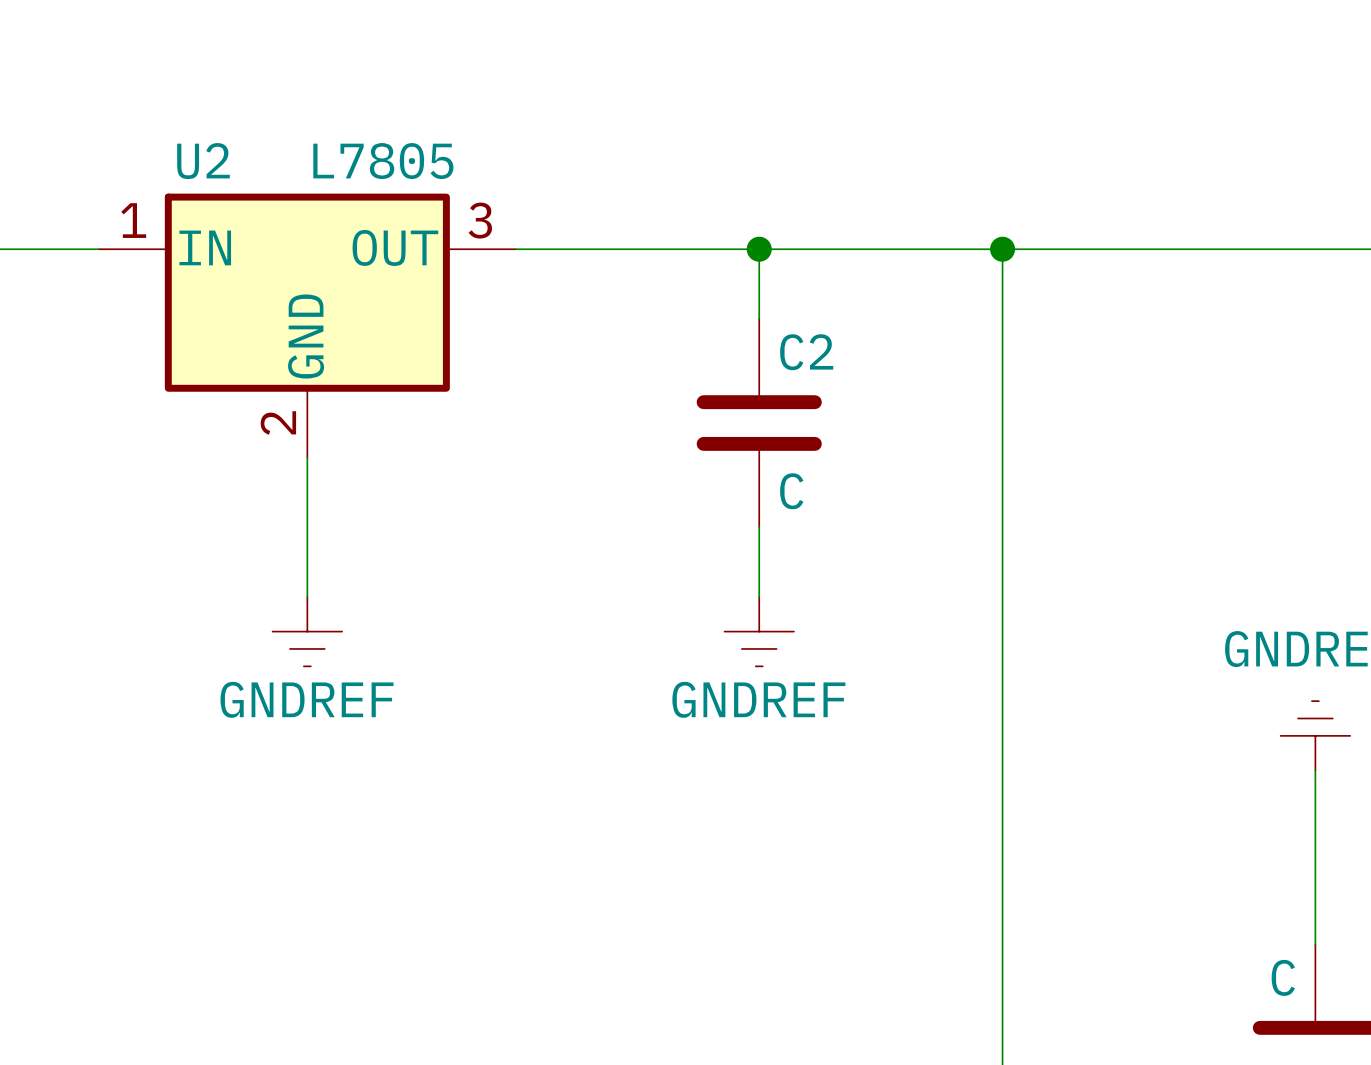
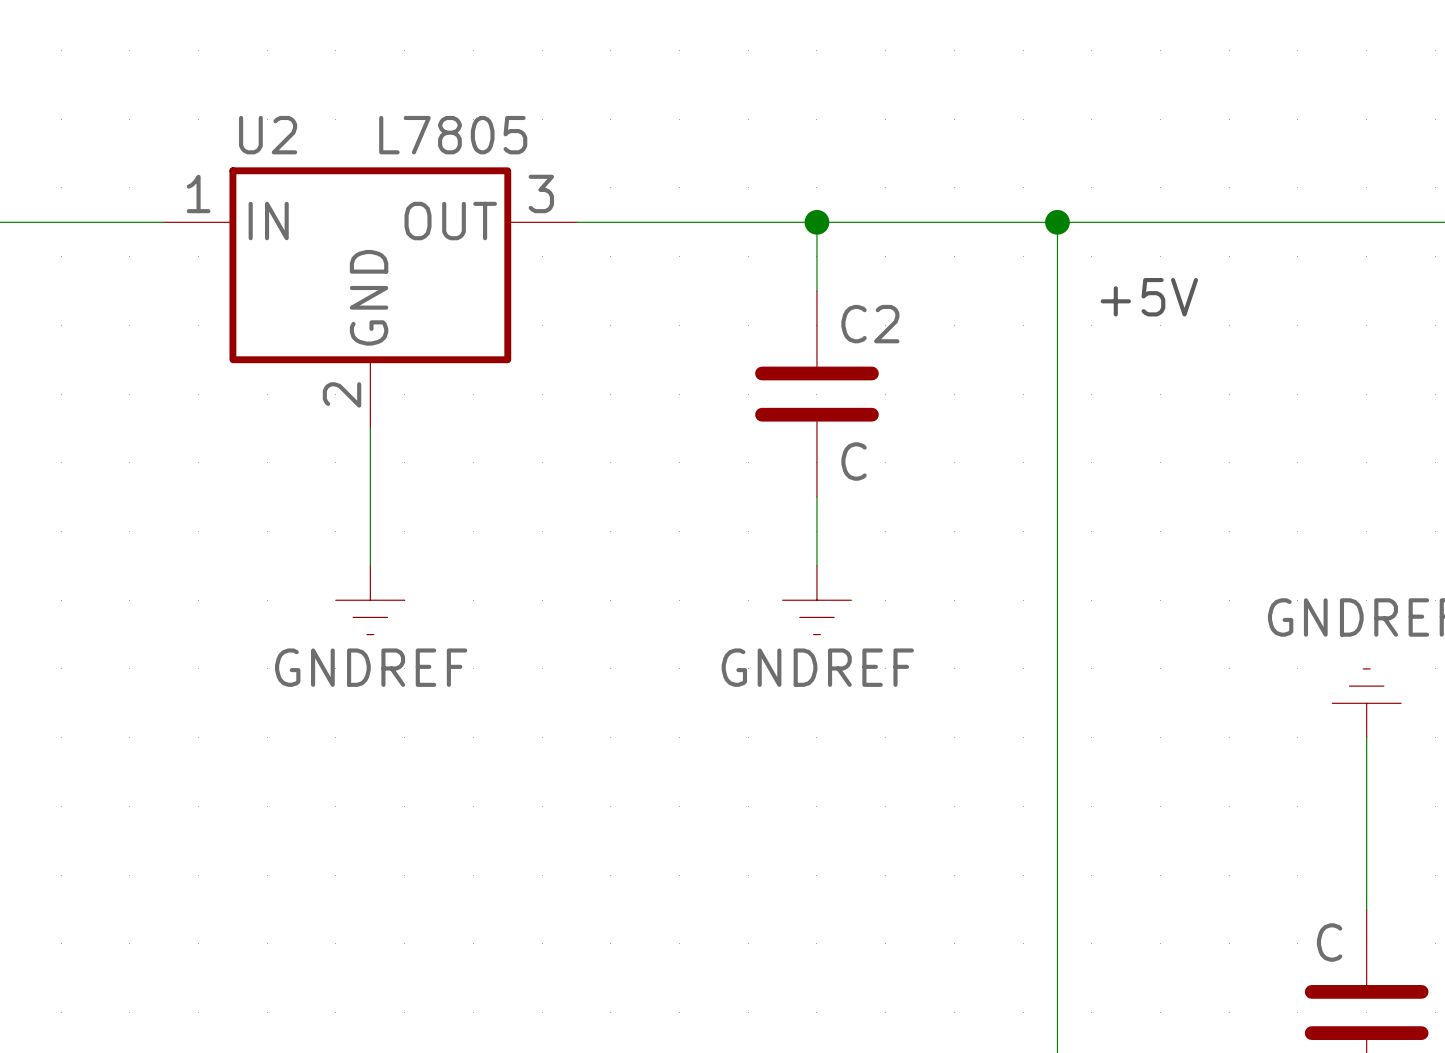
text: none -> +5V (1149, 297)

